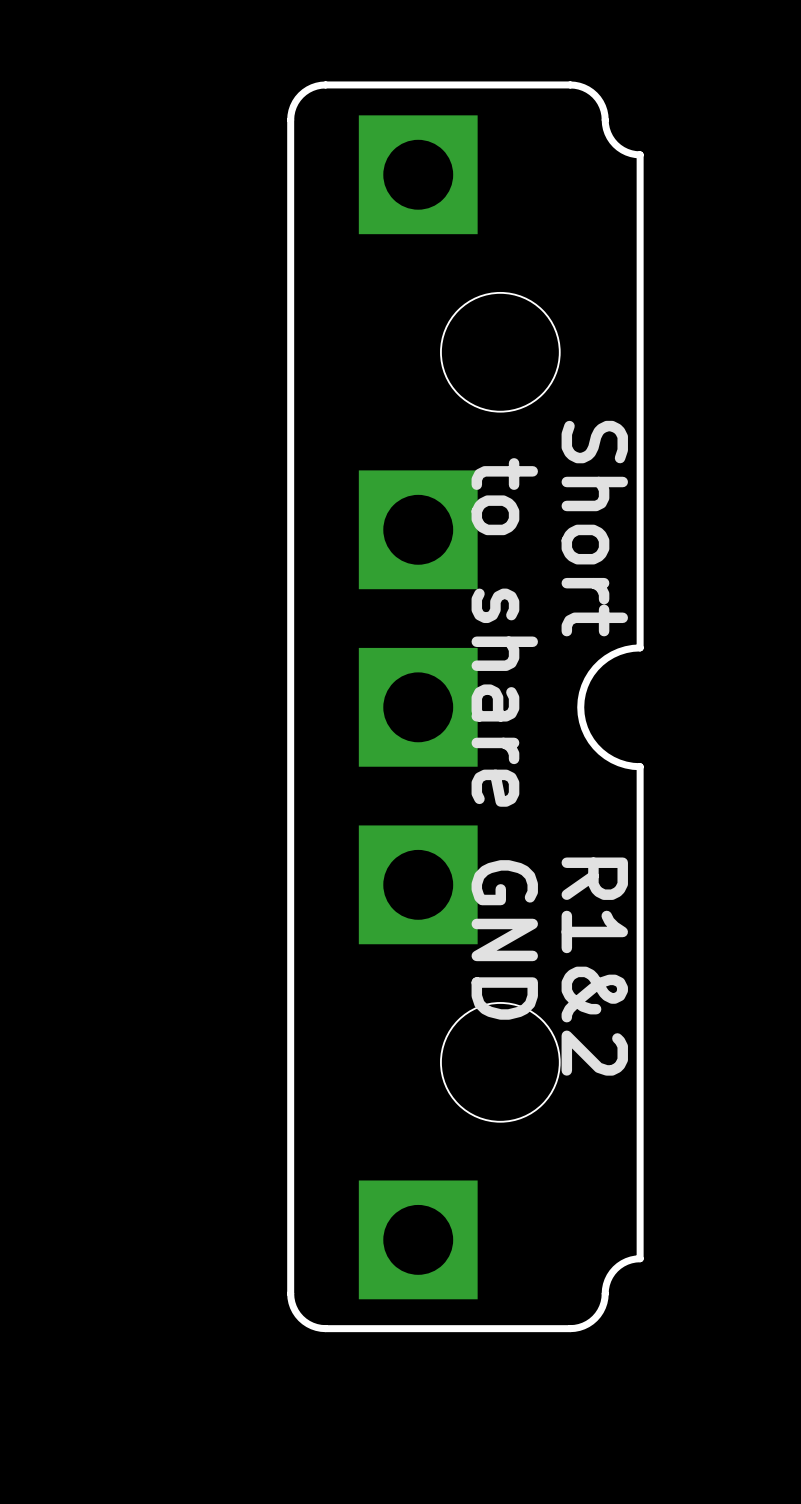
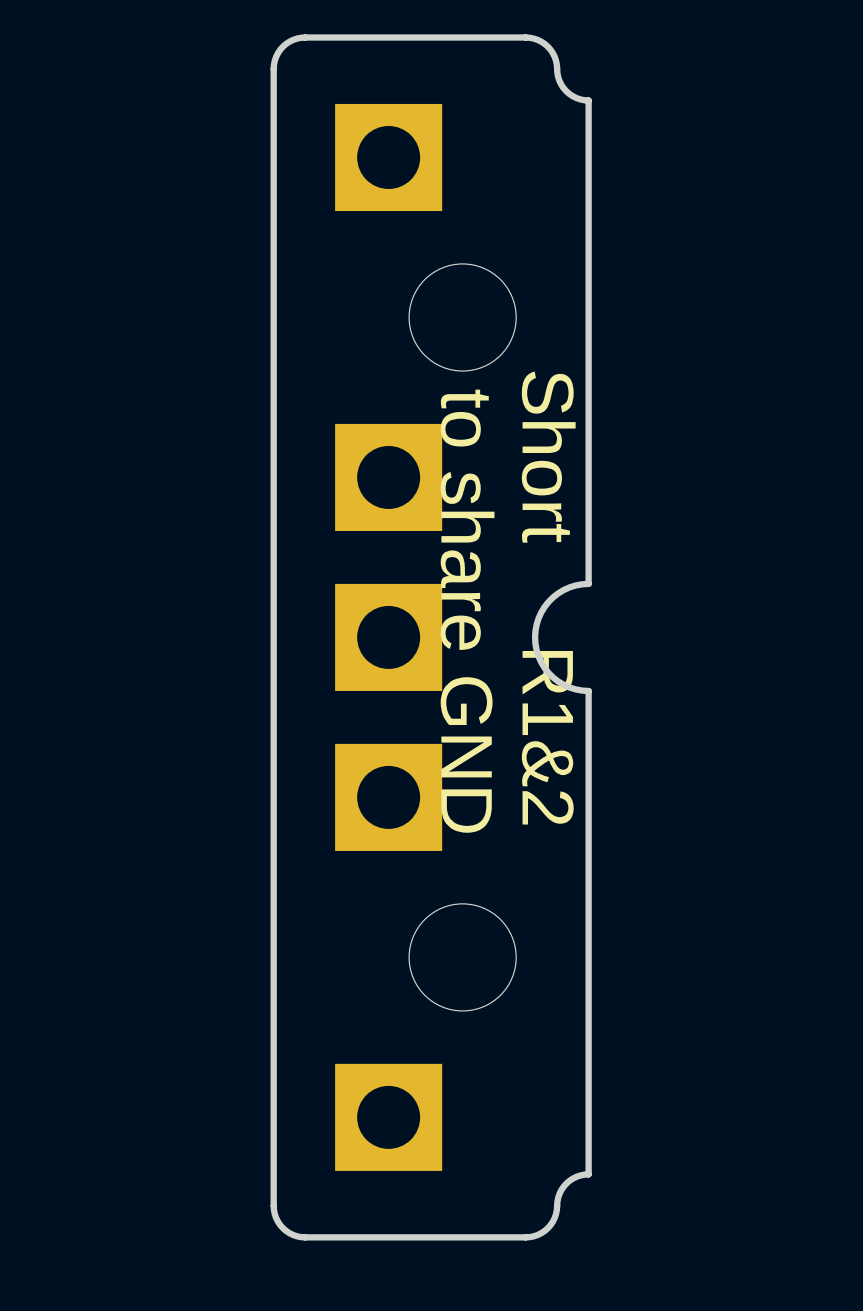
board edge: (290, 119) (293, 106) (300, 95) (312, 87) (321, 85) (574, 85) (587, 89) (597, 98) (604, 110) (607, 133) (615, 144) (626, 152) (640, 154) -> (273, 108) (274, 60) (282, 46) (297, 38) (529, 37) (541, 41) (550, 49) (556, 60) (559, 81) (566, 91) (576, 98) (588, 100) (588, 139)
board edge: (640, 1258) (626, 1261) (615, 1268) (607, 1280) (604, 1302) (597, 1314) (587, 1323) (574, 1328) (321, 1328) (312, 1325) (300, 1318) (293, 1307) (290, 1293) -> (588, 1134) (588, 1174) (576, 1176) (566, 1183) (559, 1193) (556, 1214) (550, 1225) (541, 1233) (529, 1237) (297, 1236) (282, 1228) (274, 1214) (273, 1165)

